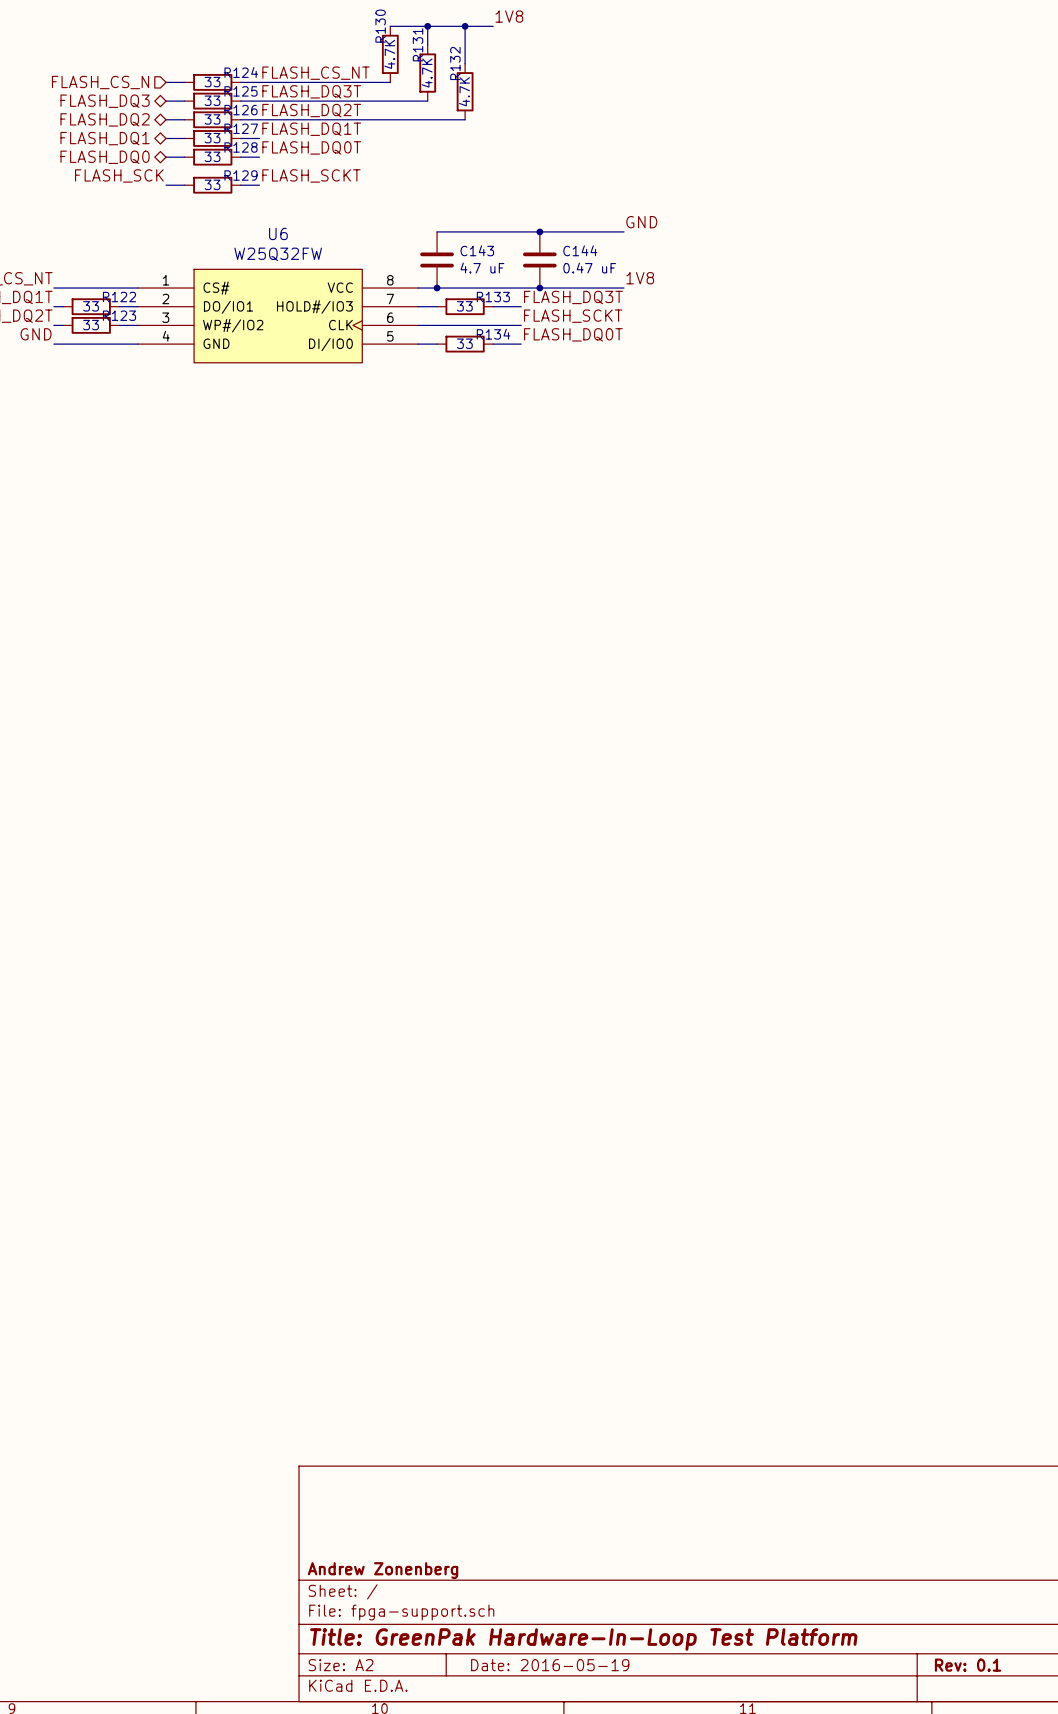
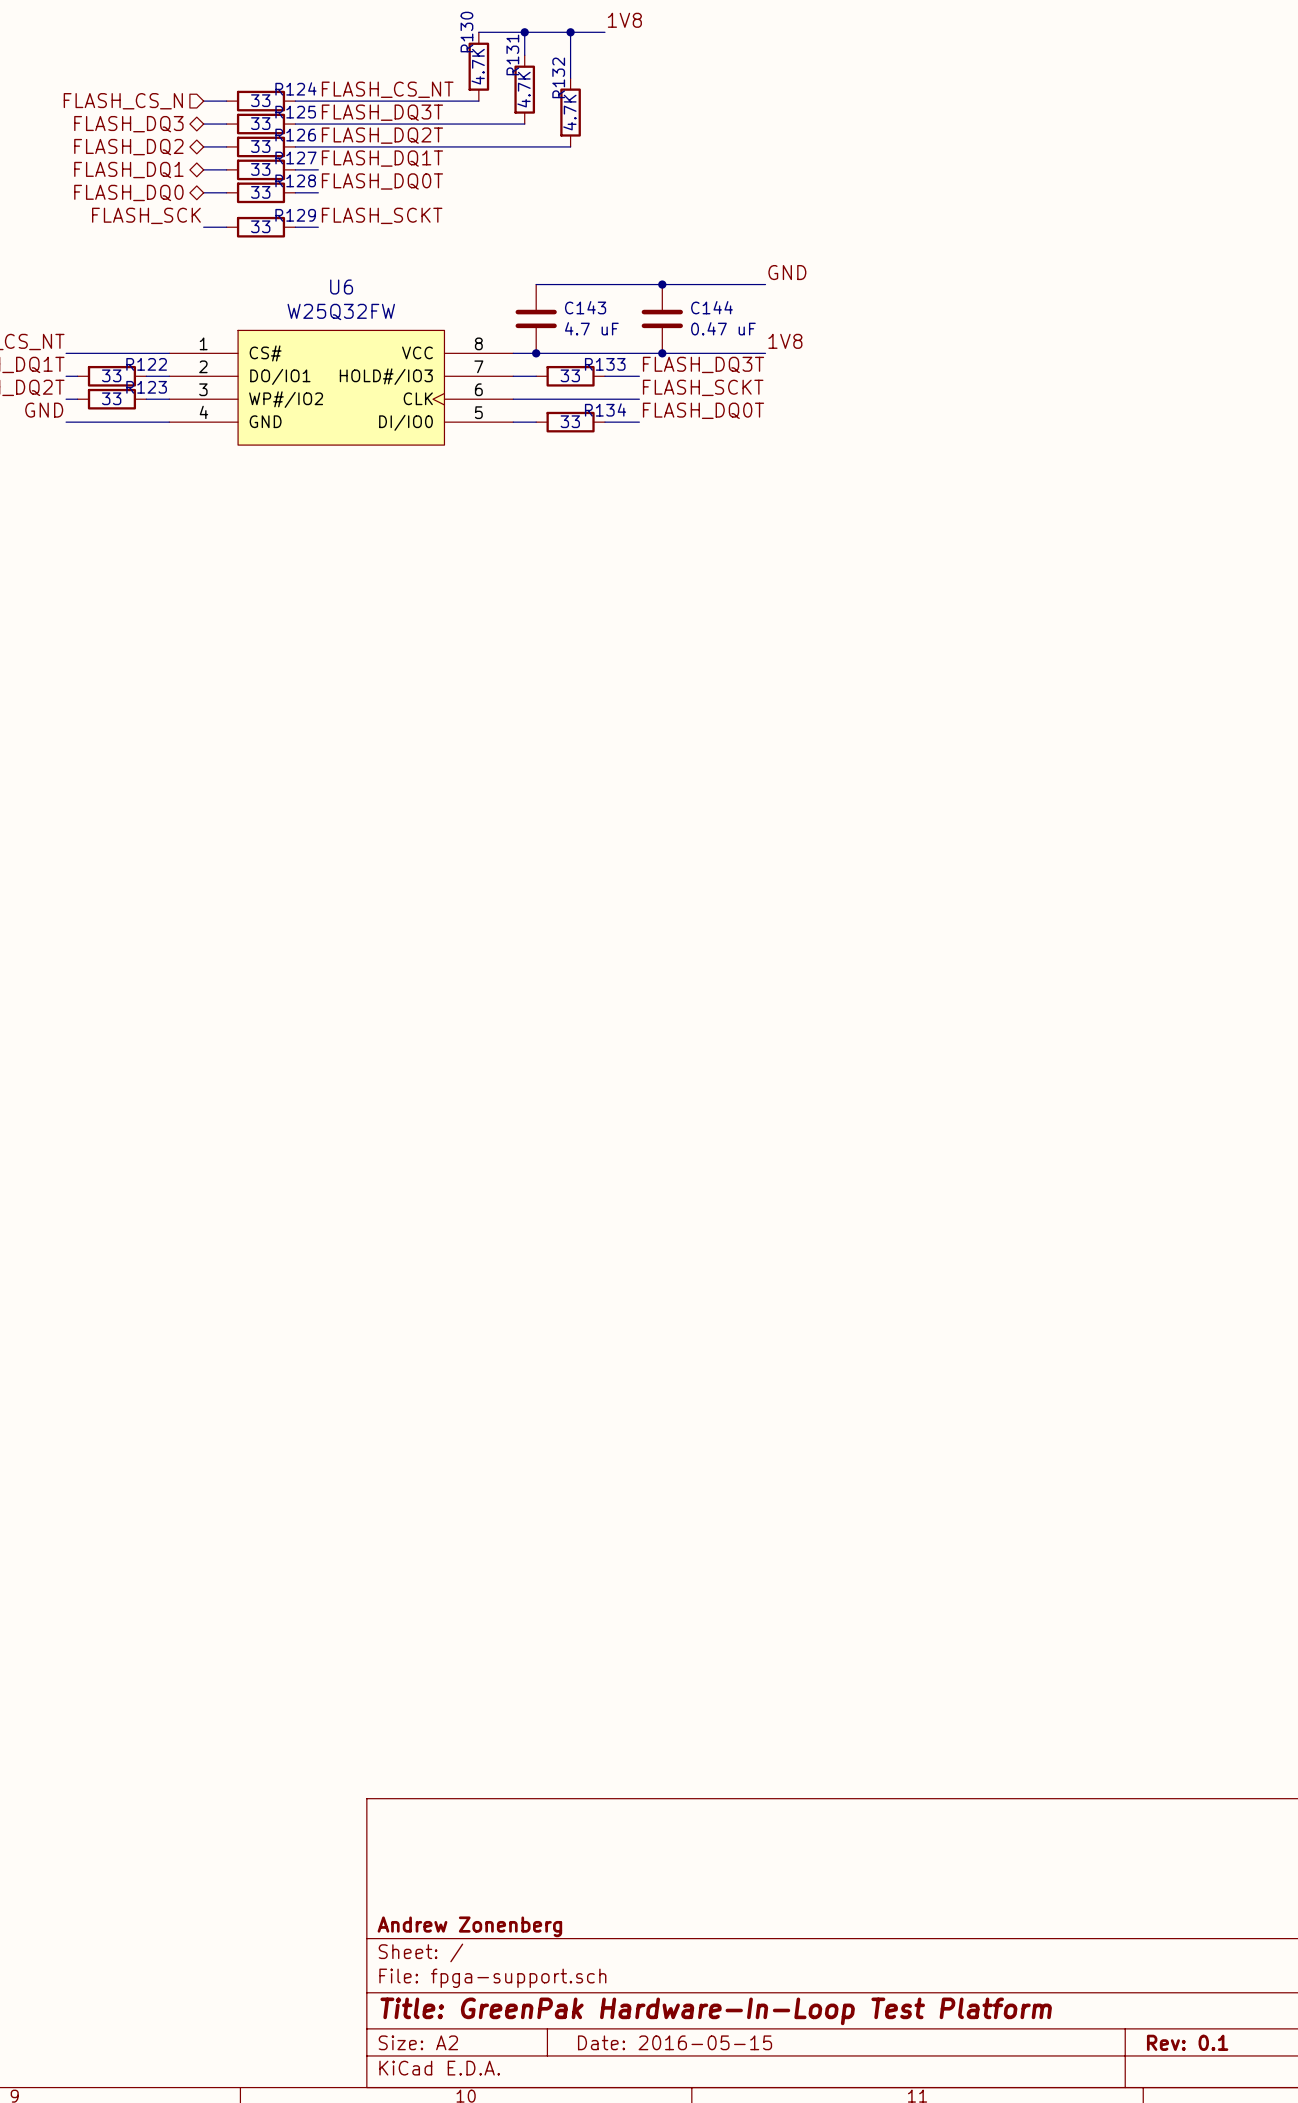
title block: Date: 2016-05-19 (550, 1665) -> Date: 2016-05-15 (675, 2042)

